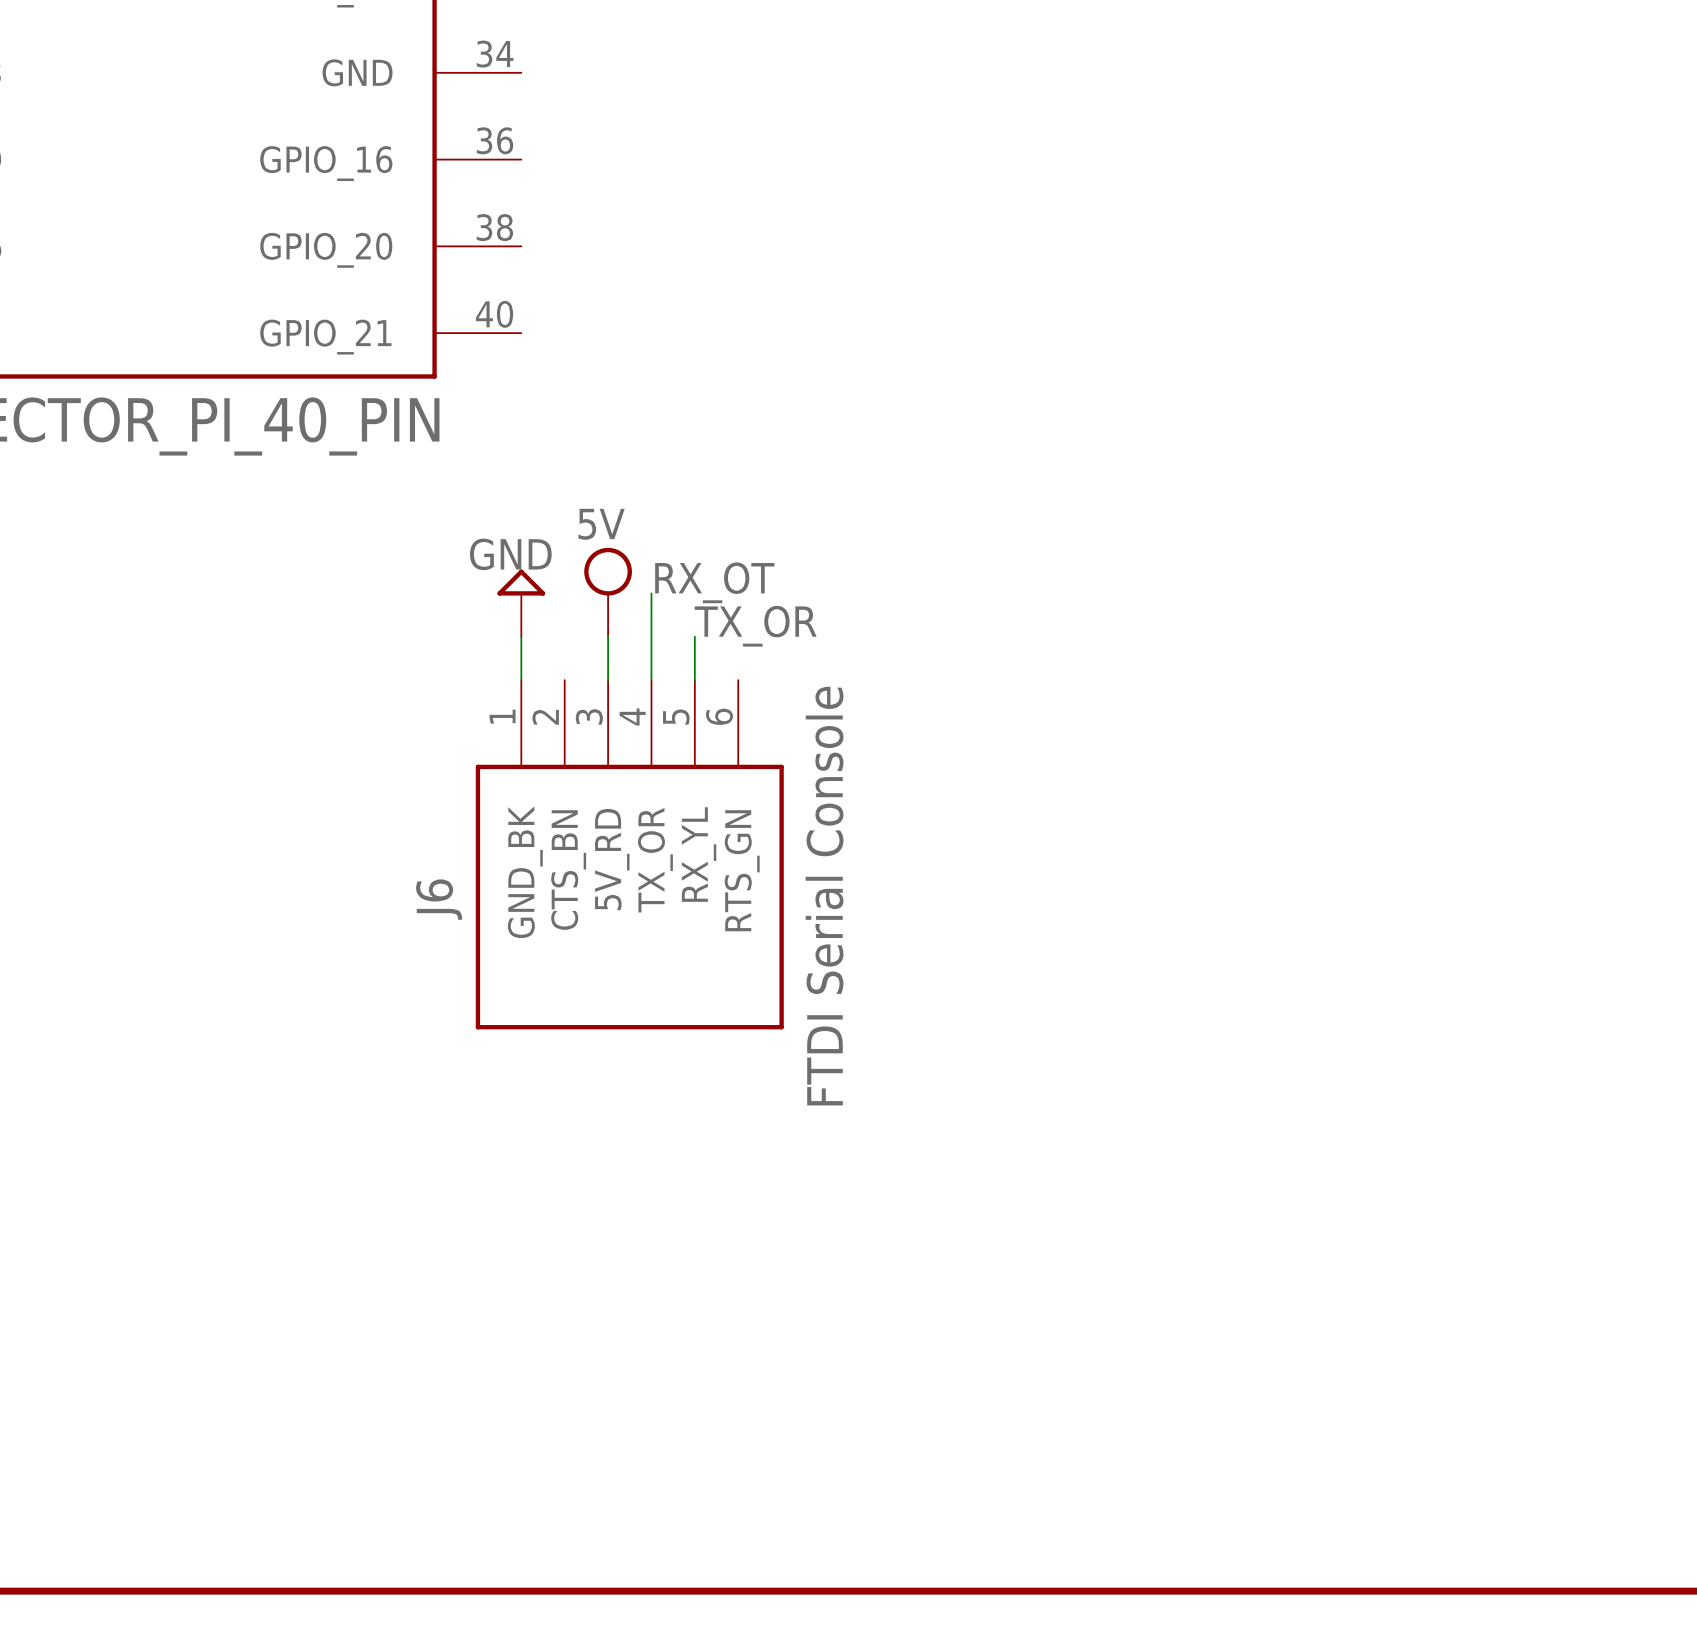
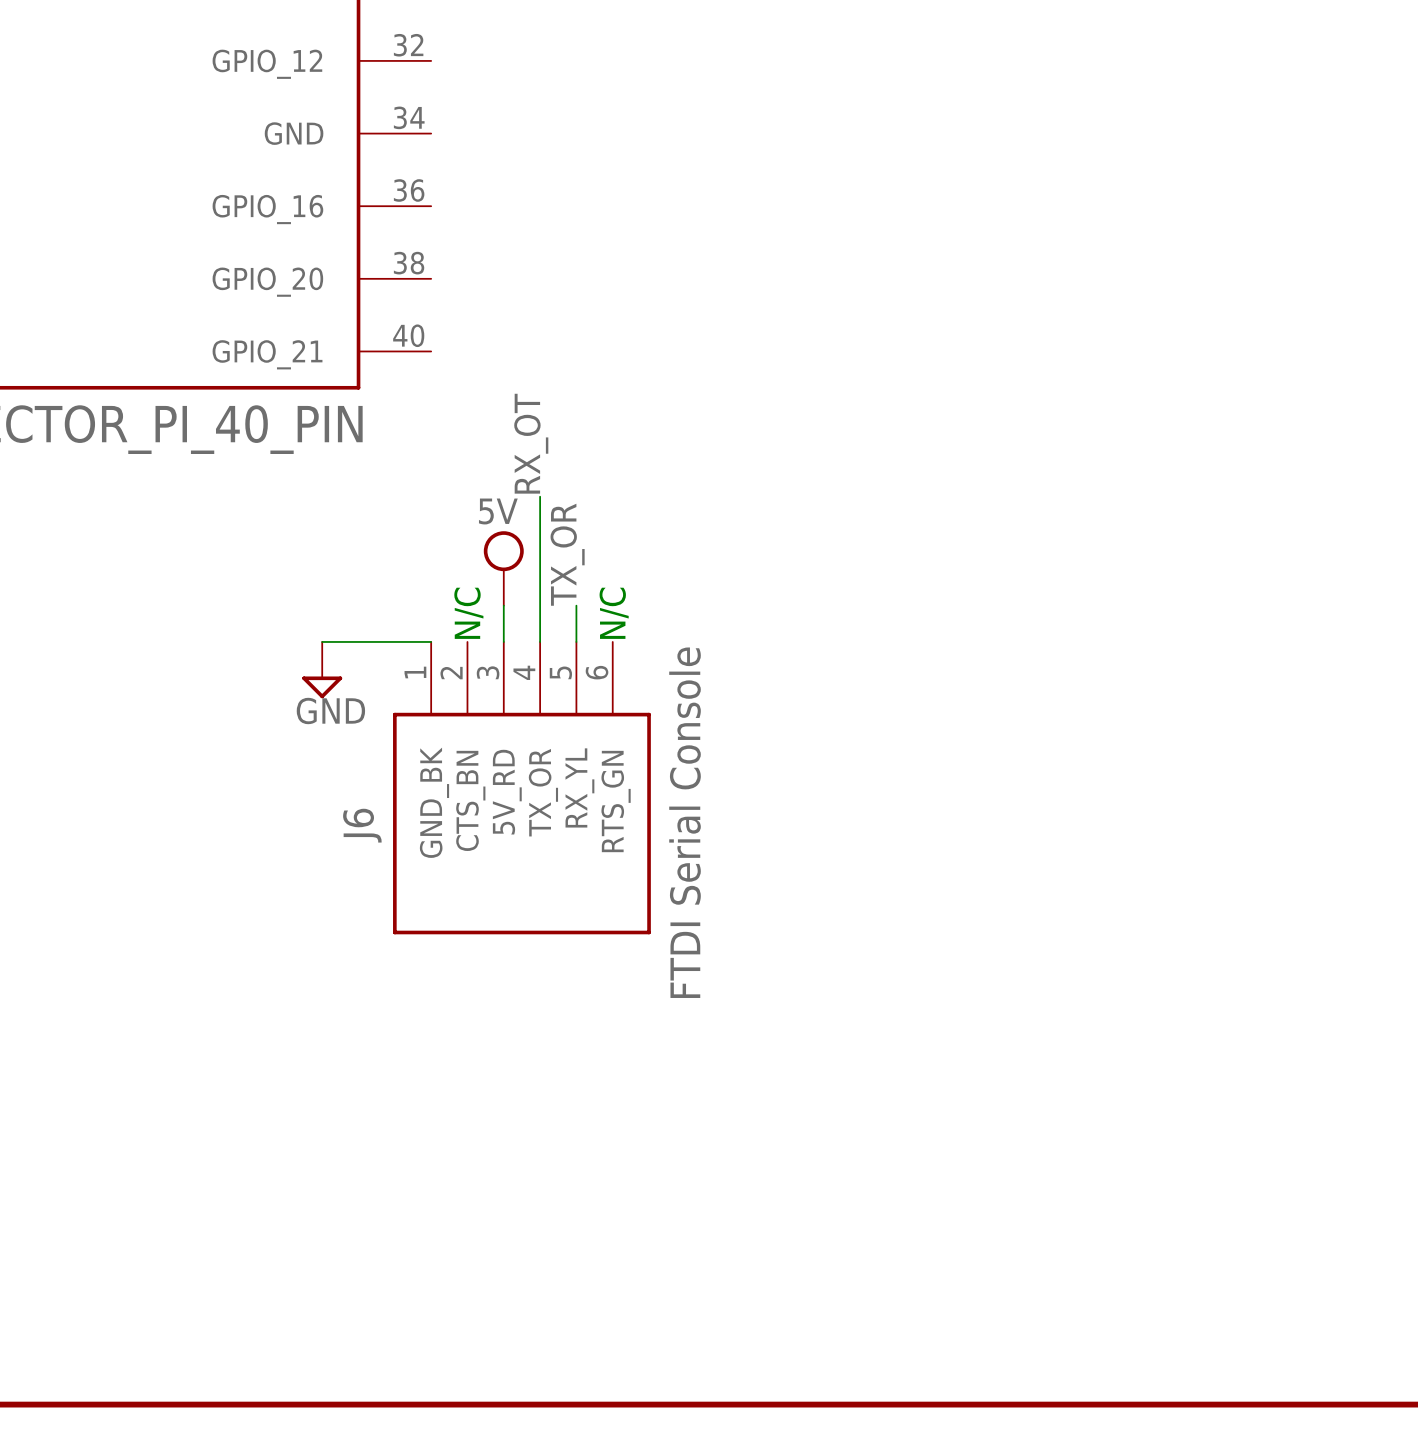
wire: none -> (540, 496) (540, 569)
power symbol rotation: 0° (521, 582) -> 180° (322, 687)
label rotation: 0° (714, 582) -> 90° counterclockwise (531, 443)
label position: RX_OT (714, 582) -> RX_OT (531, 443)
power symbol position: GND (521, 603) -> GND (322, 670)
label rotation: 0° (755, 626) -> 90° counterclockwise (567, 554)
wire: (521, 636) (521, 680) -> (322, 641) (431, 641)
text: none -> N/C (468, 613)
text: none -> N/C (614, 613)

